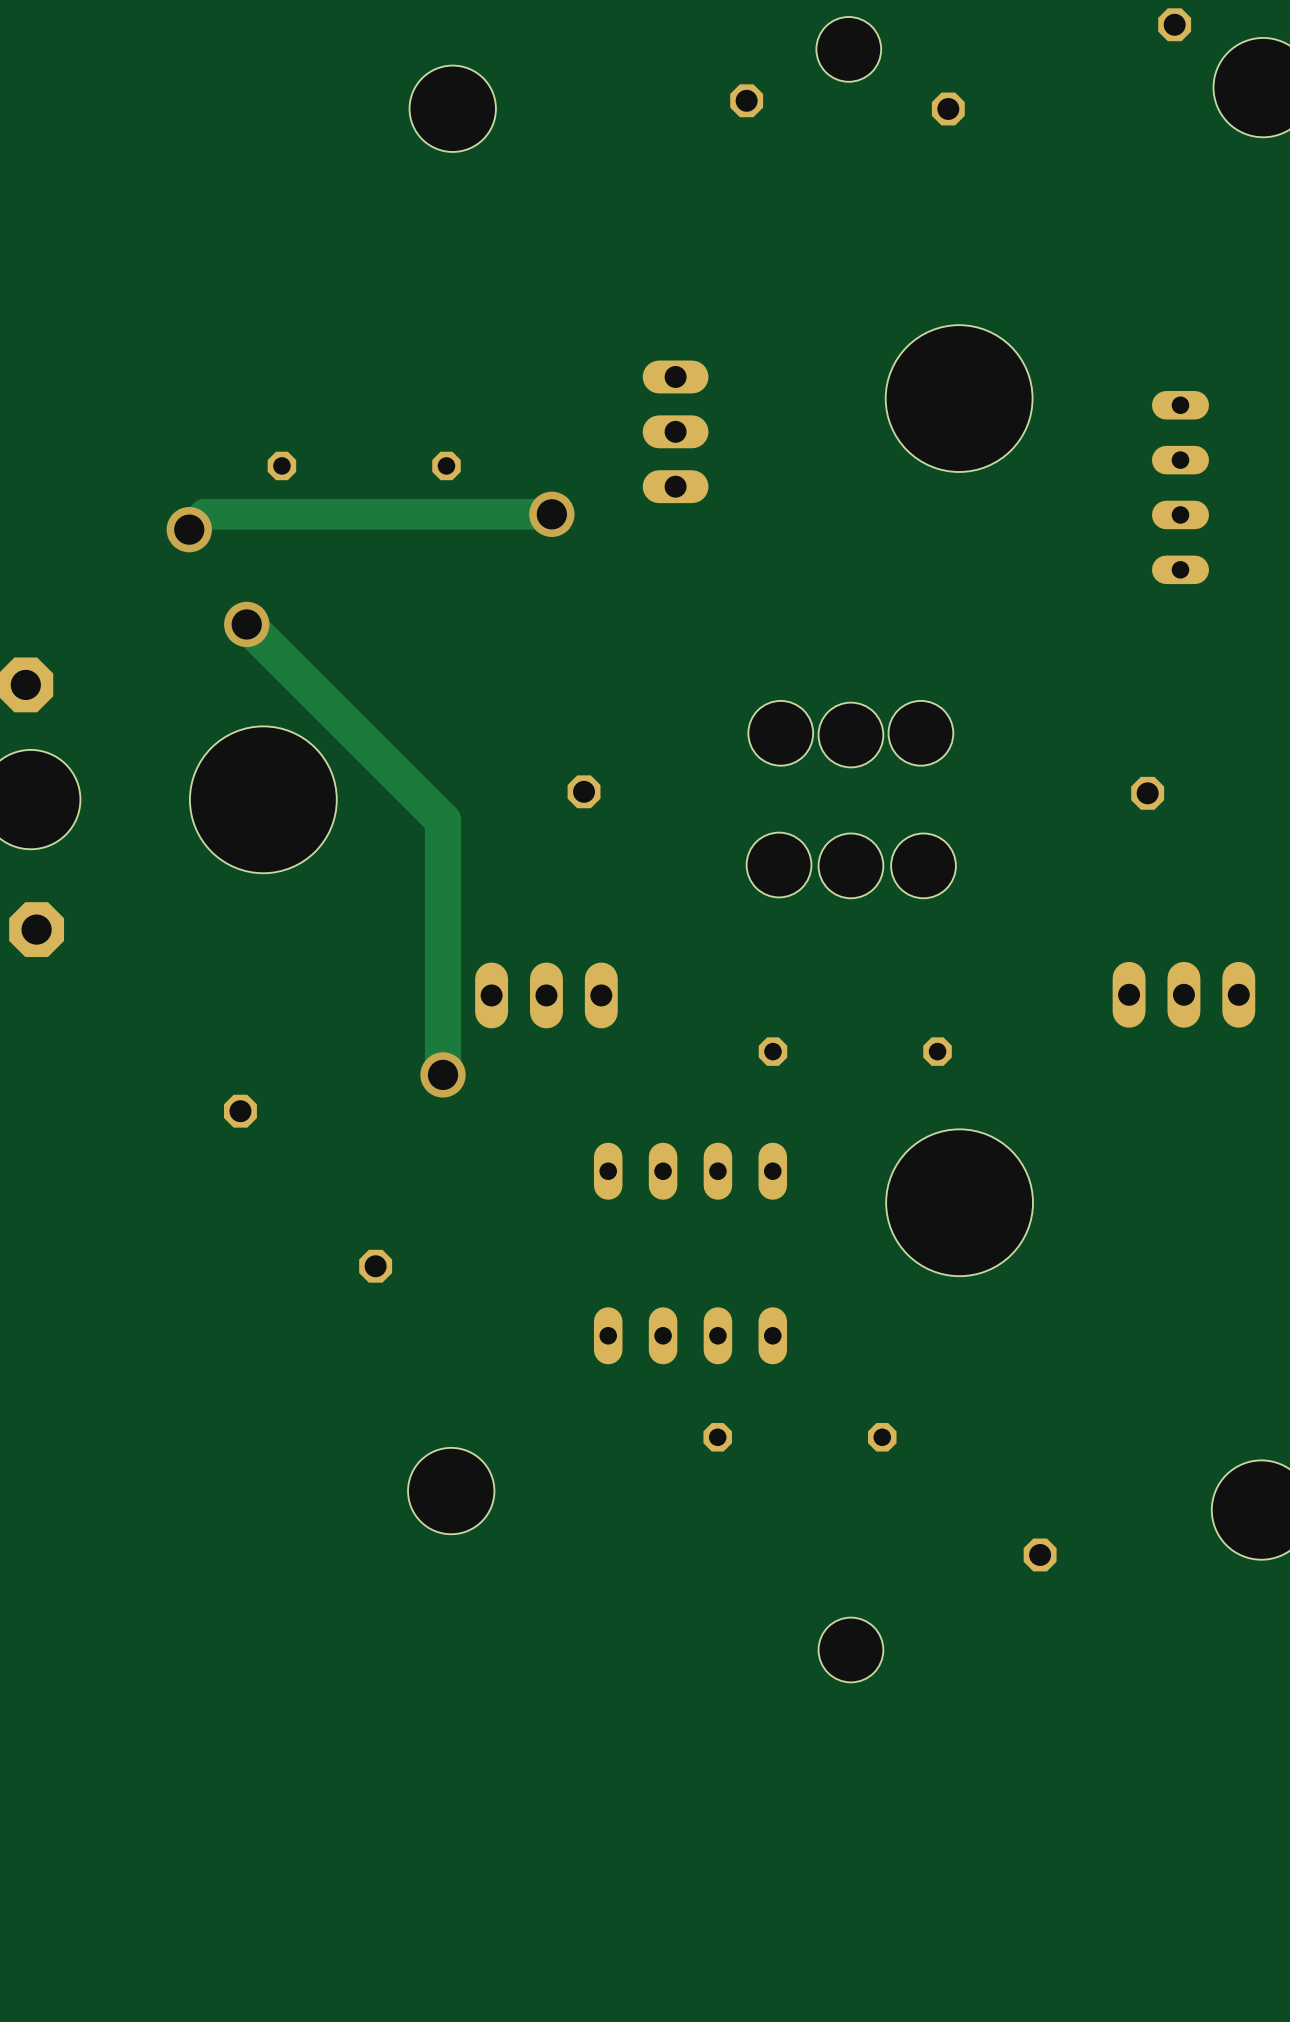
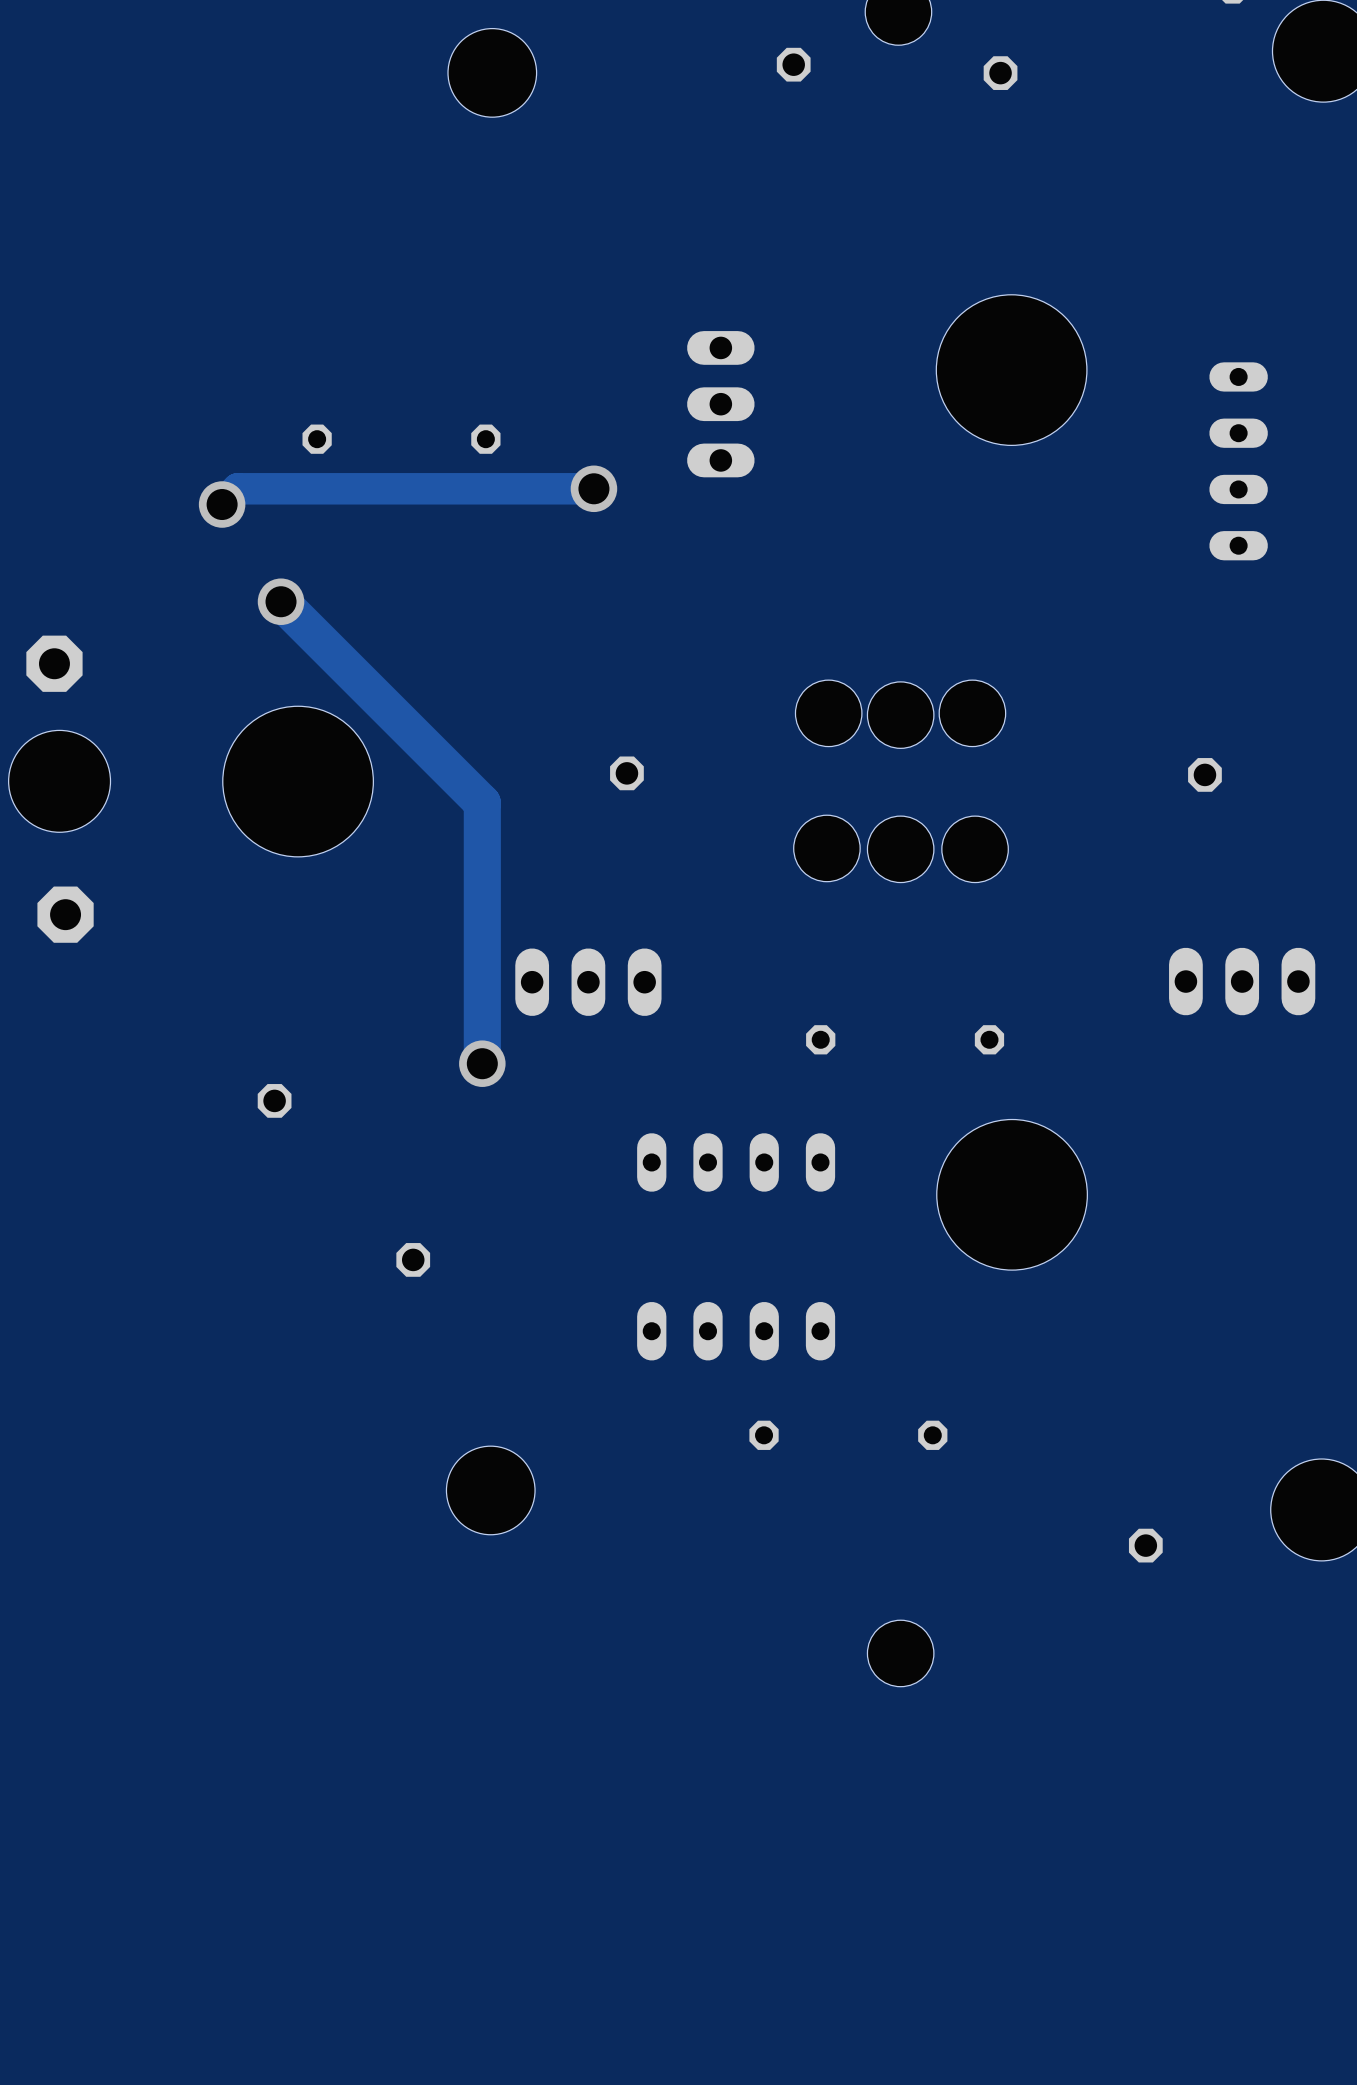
part position: (1040, 1554) -> (1145, 1545)

